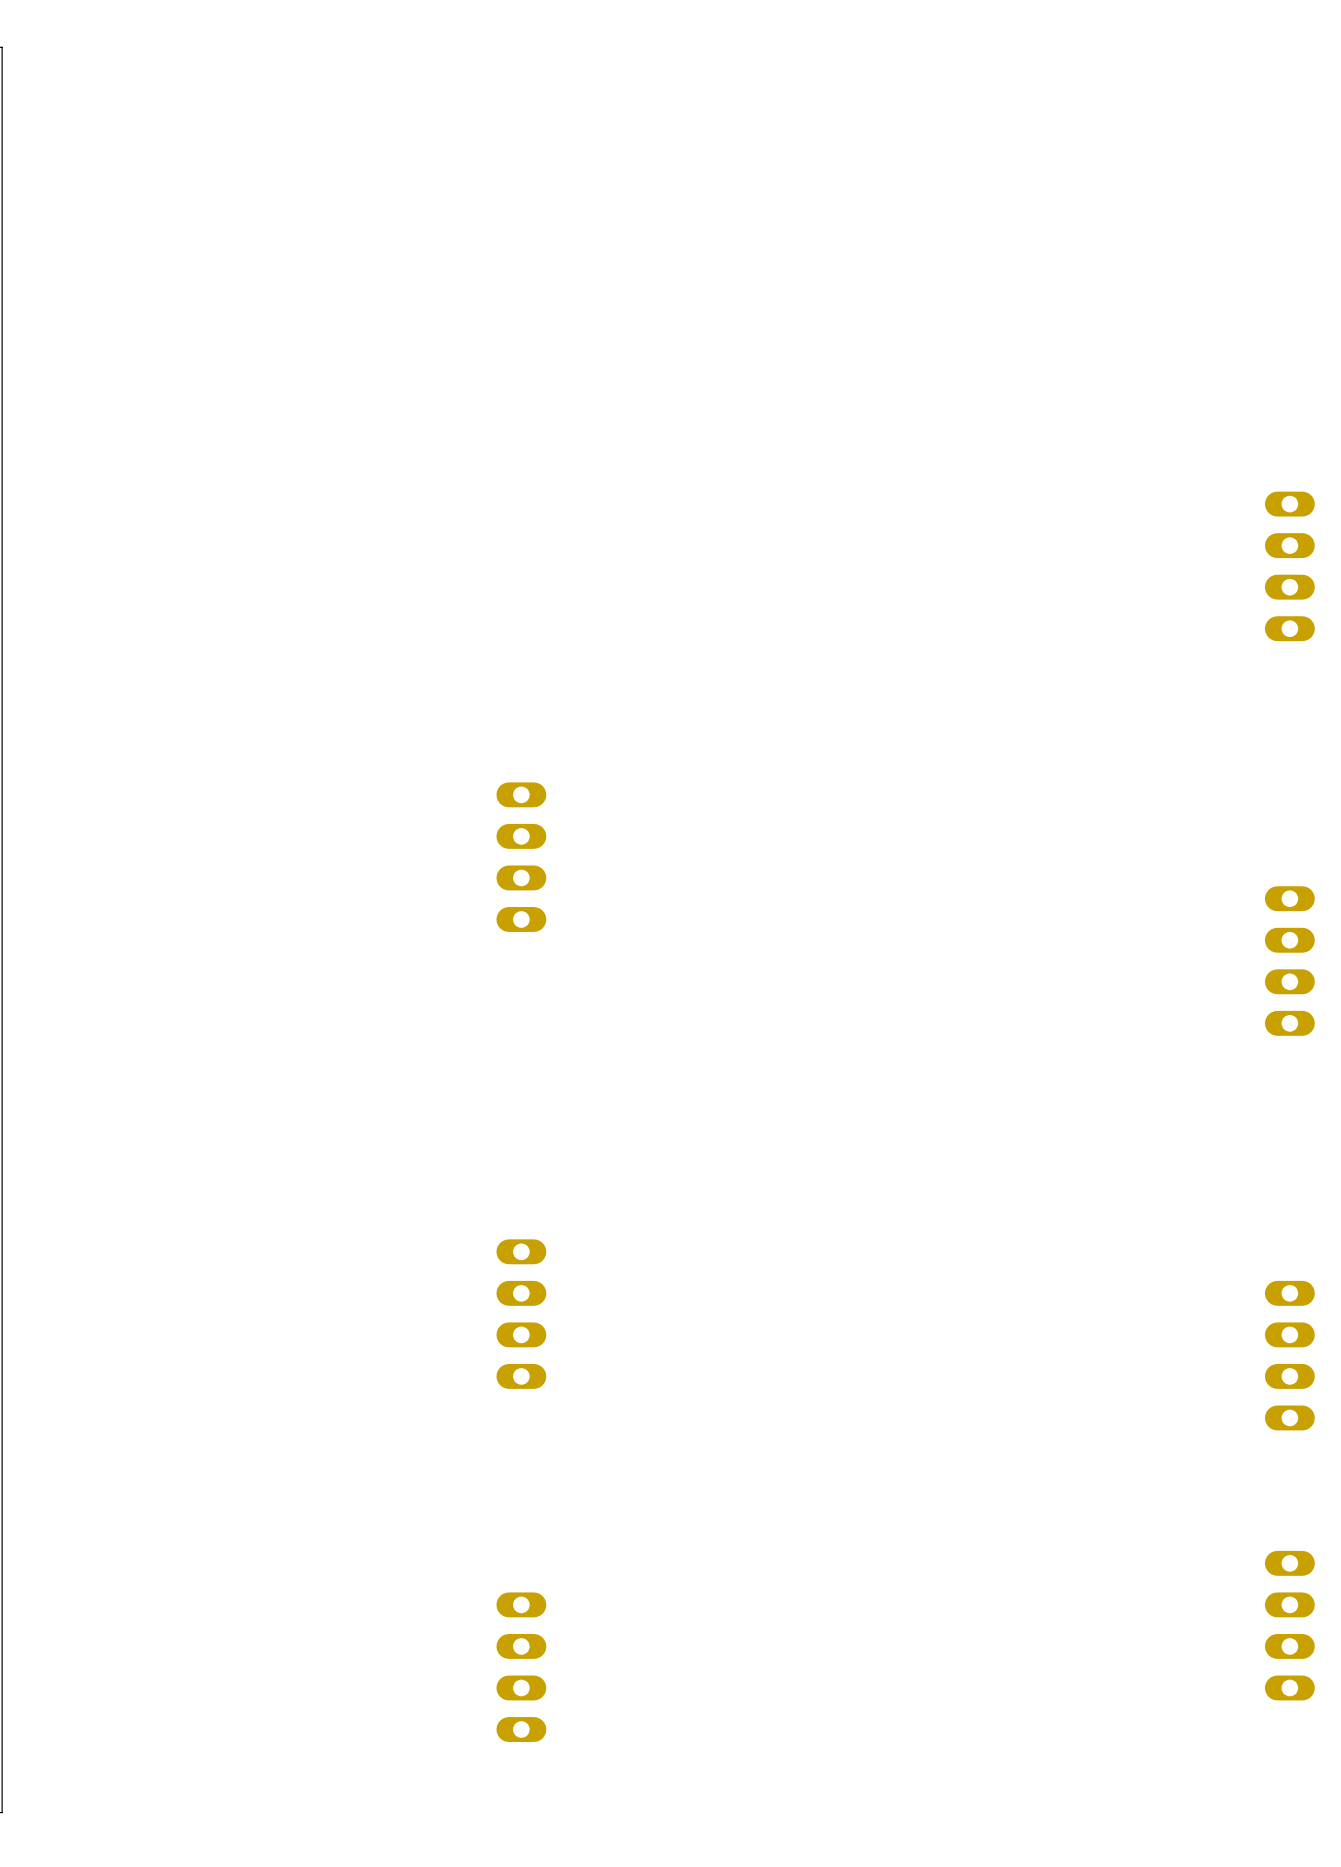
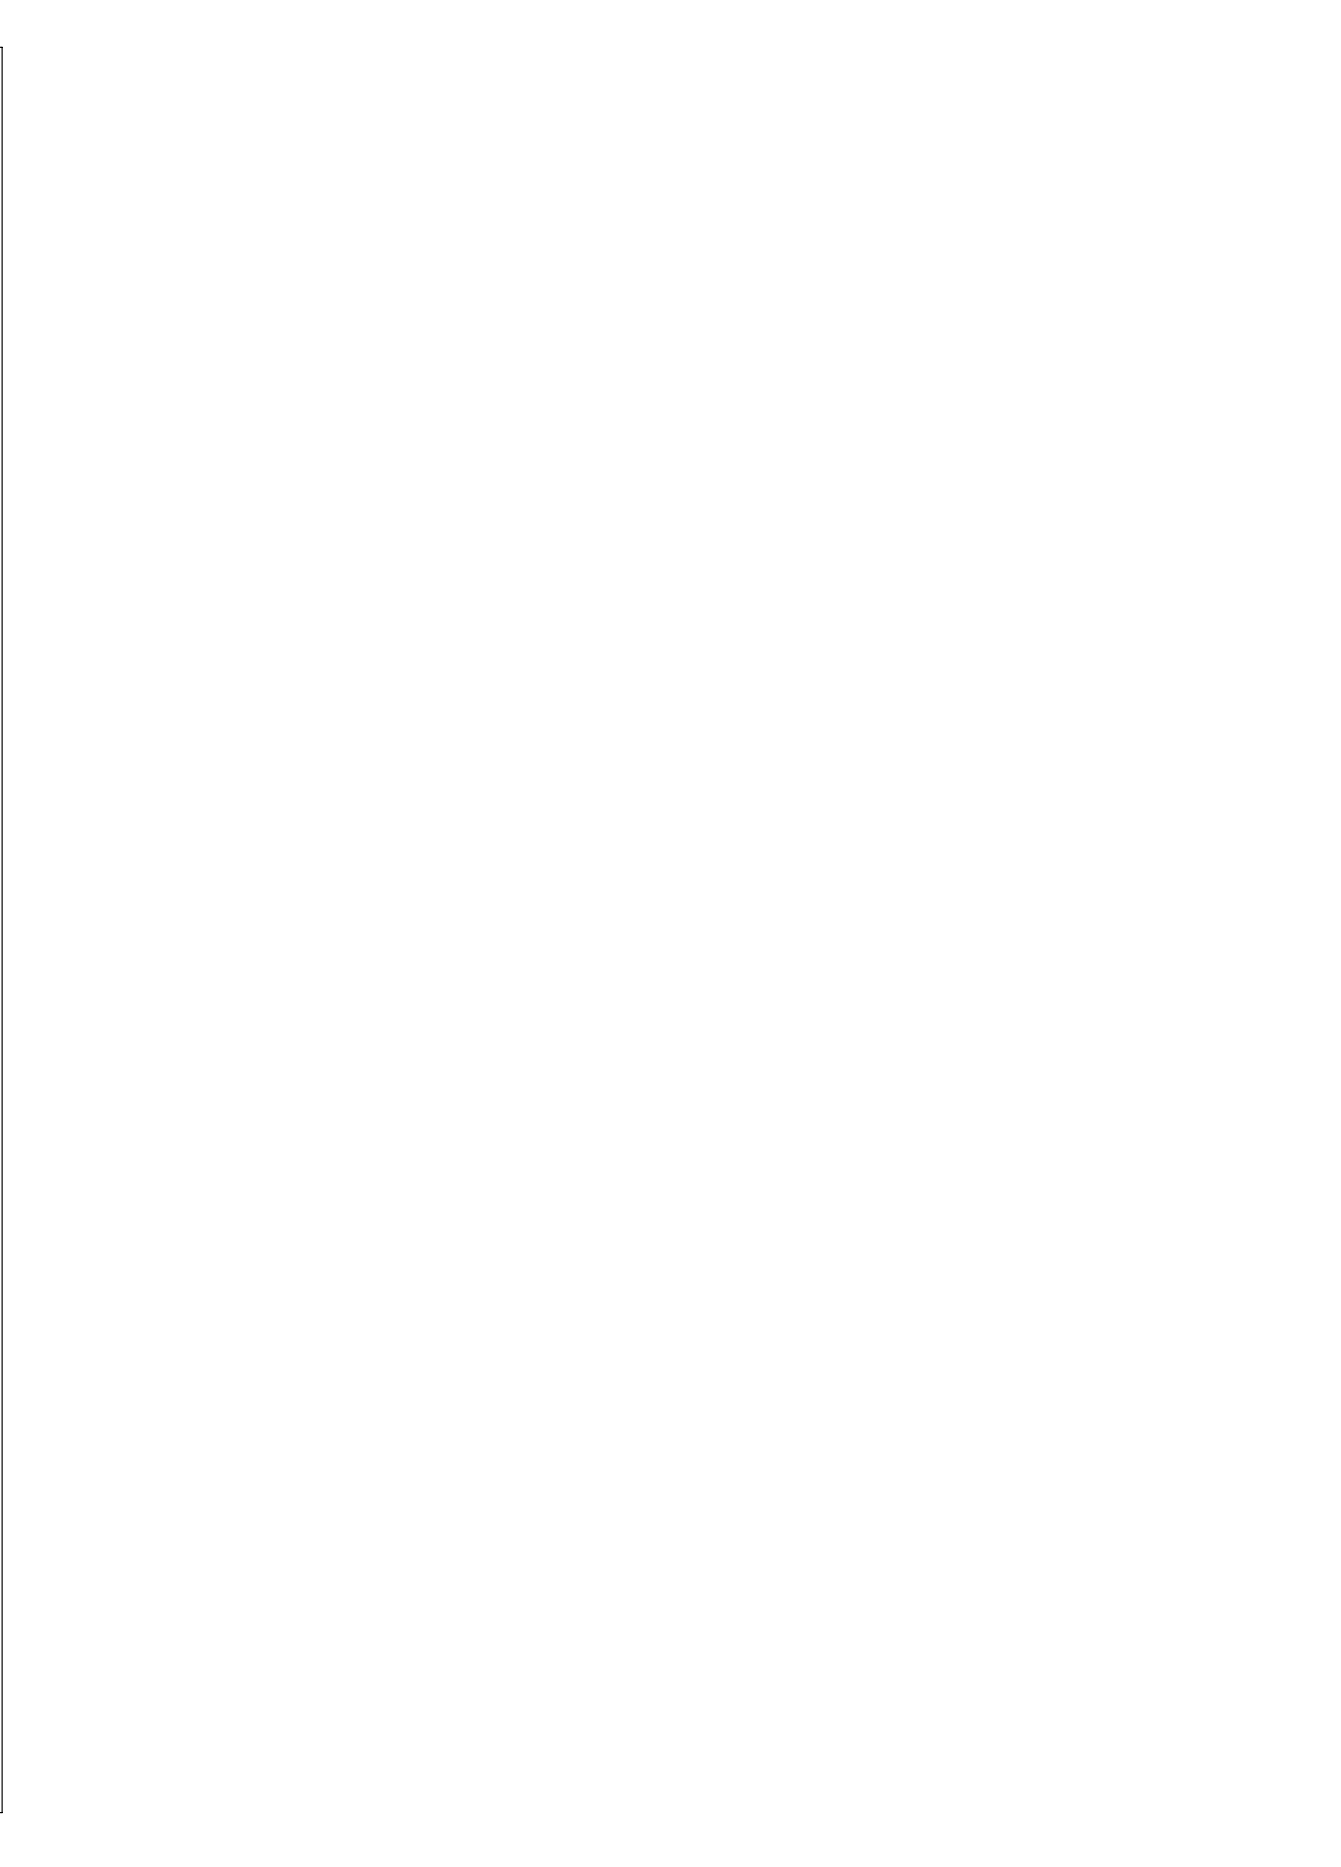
part: (1289, 566) -> none
part: (521, 857) -> none
part: (1289, 961) -> none
part: (521, 1314) -> none
part: (1289, 1355) -> none
part: (1289, 1625) -> none
part: (521, 1667) -> none

